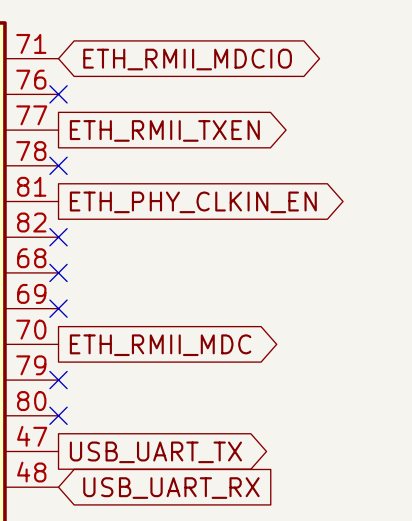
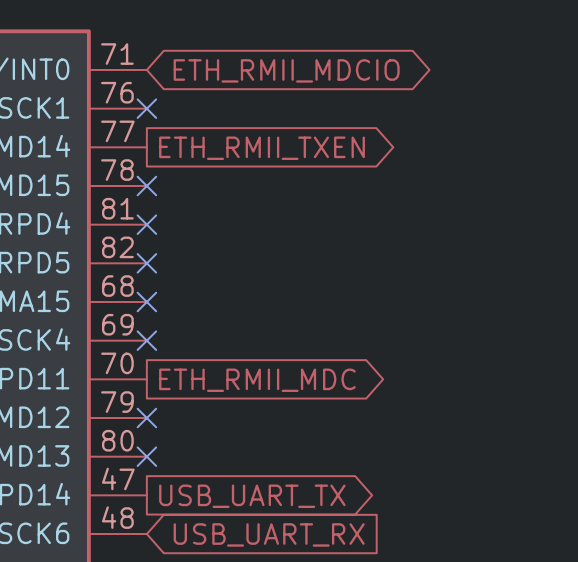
no-connect mark: none -> (146, 224)
global label: ETH_PHY_CLKIN_EN (193, 202) -> none

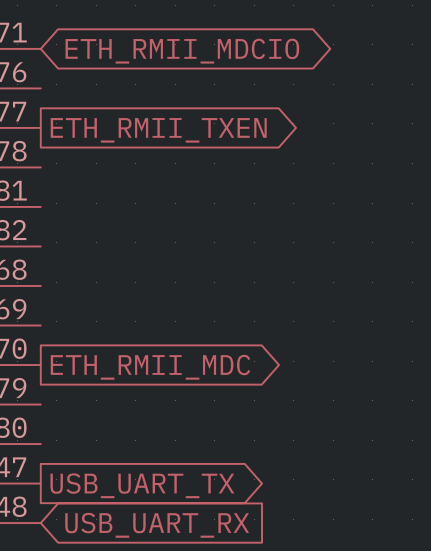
no-connect mark: (146, 108) -> none
no-connect mark: (146, 185) -> none
no-connect mark: (146, 224) -> none
no-connect mark: (146, 263) -> none
no-connect mark: (146, 302) -> none
no-connect mark: (146, 340) -> none
no-connect mark: (146, 418) -> none
no-connect mark: (146, 456) -> none

